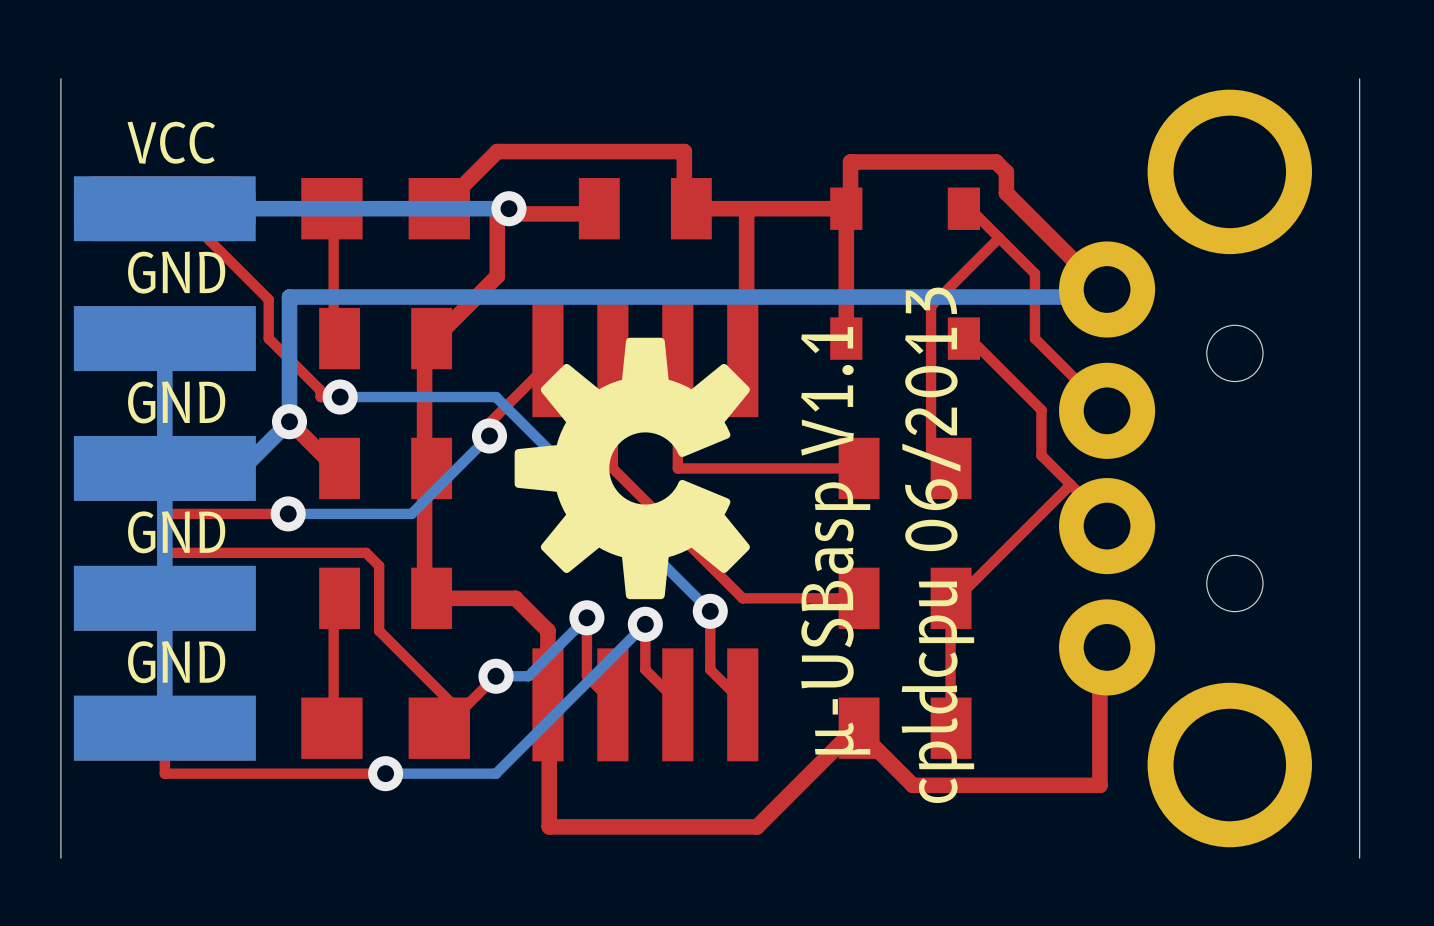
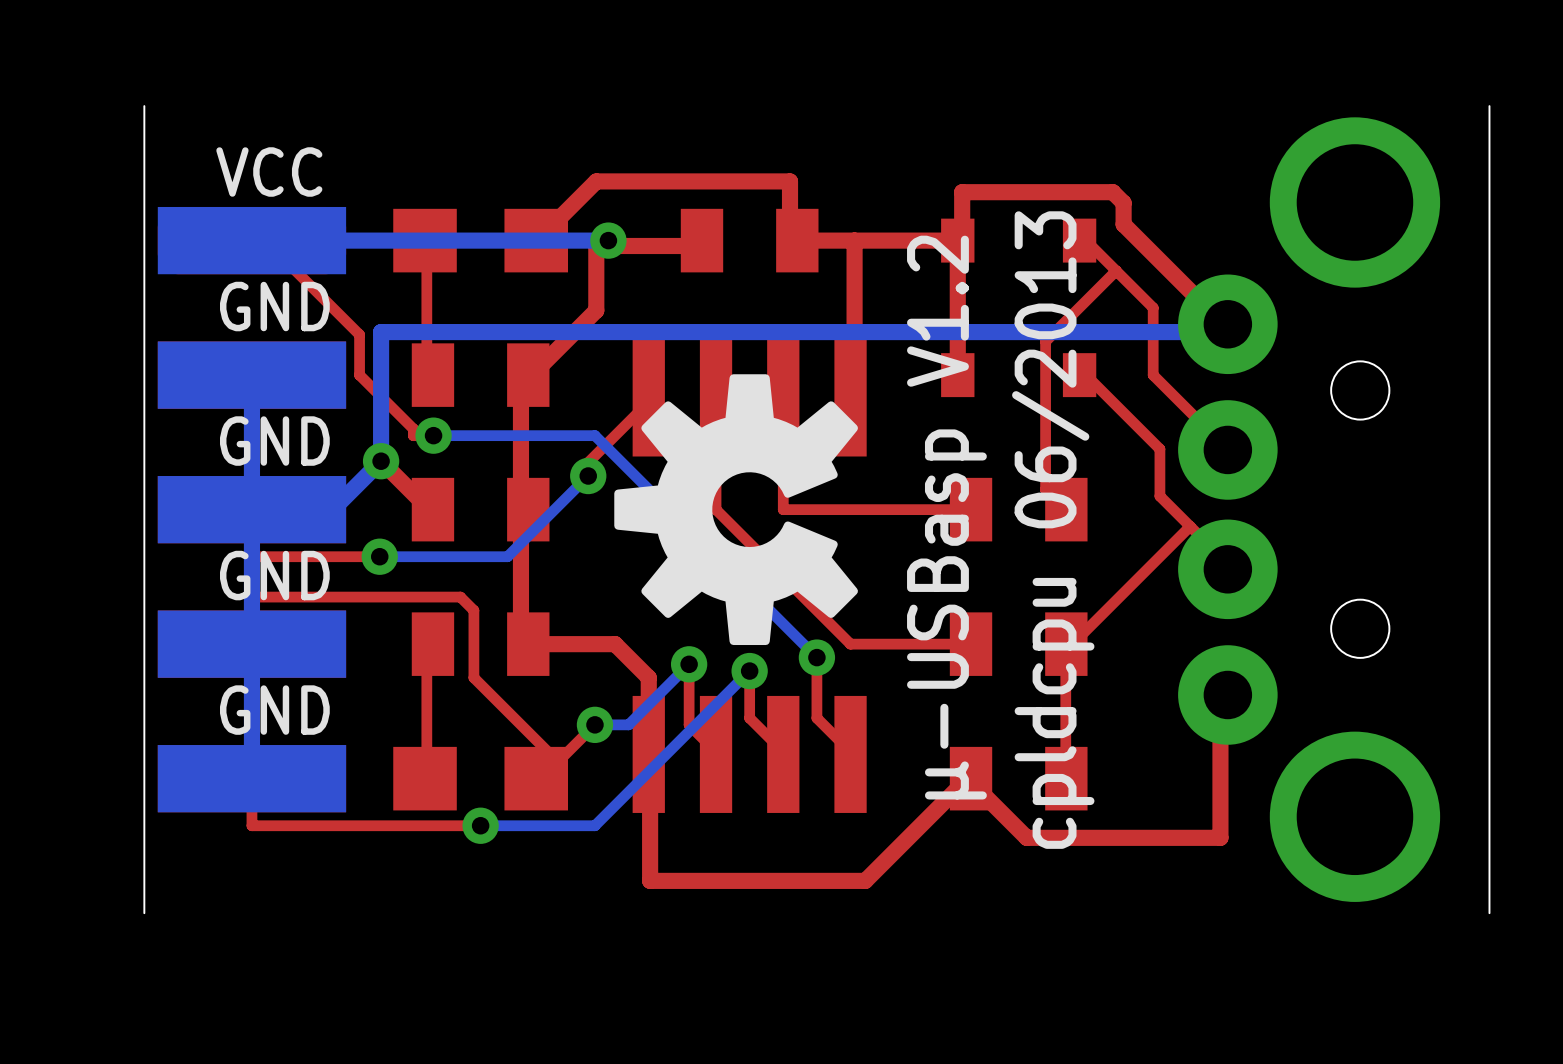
text: µ-USBasp V1.1 (835, 540) -> µ-USBasp V1.2 (946, 517)

